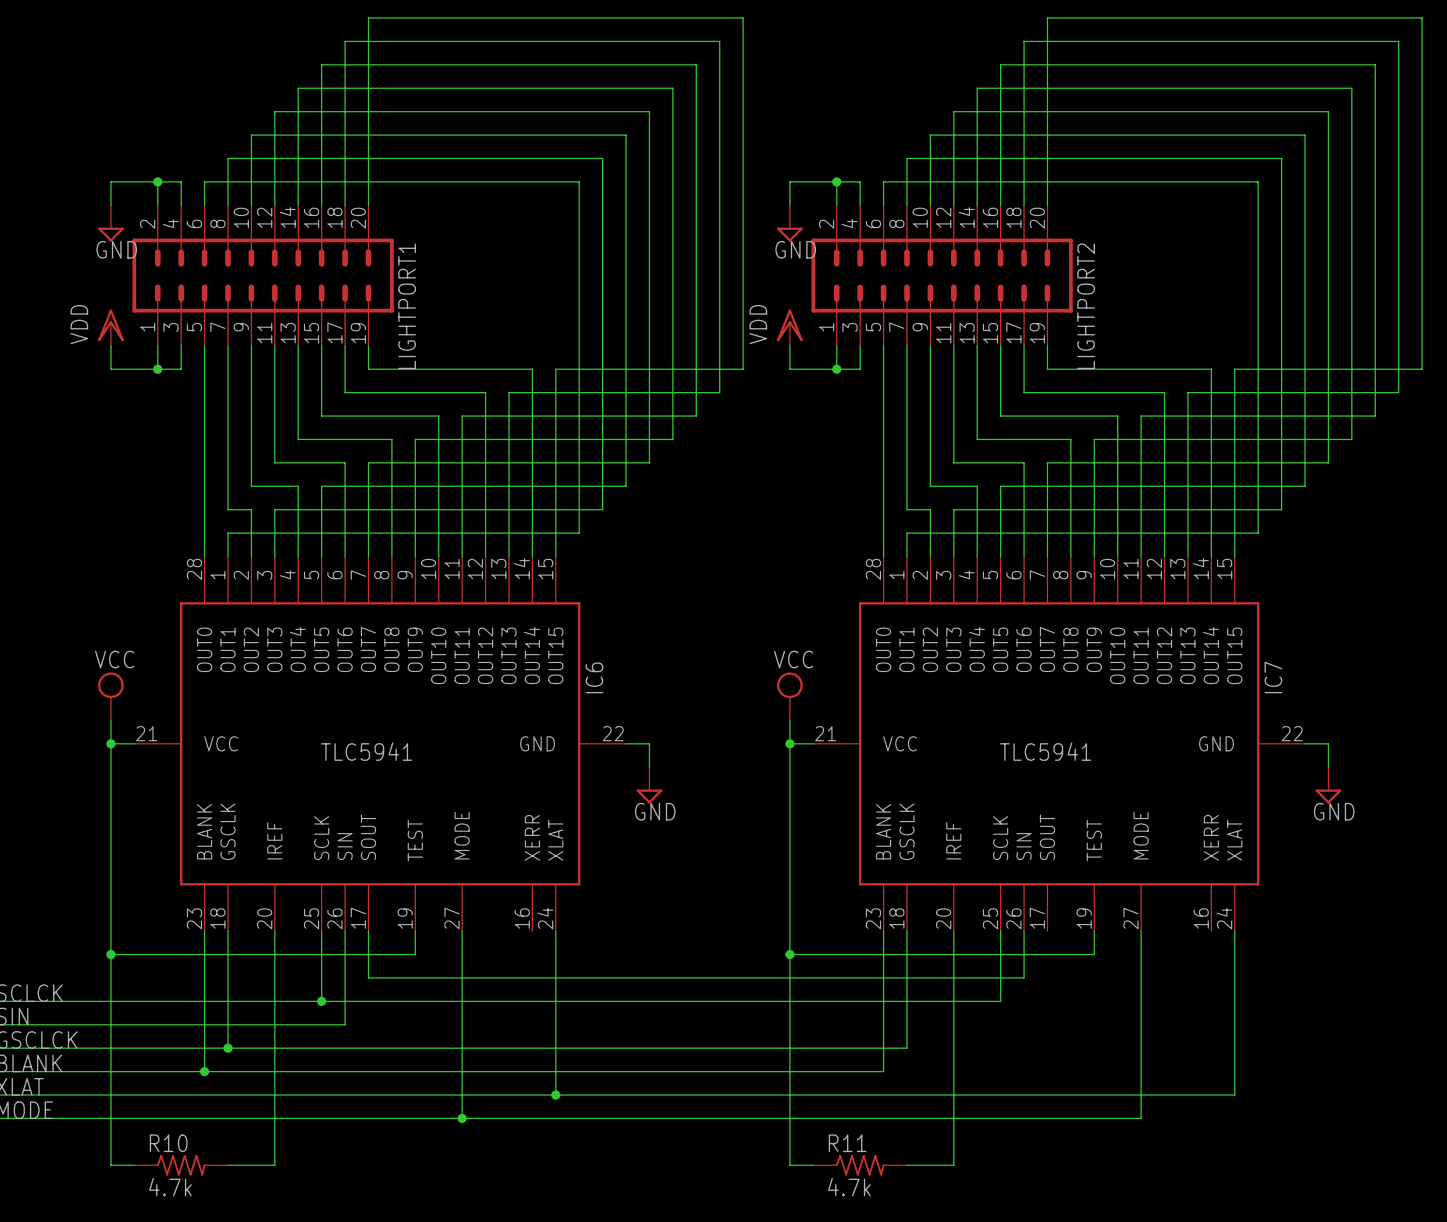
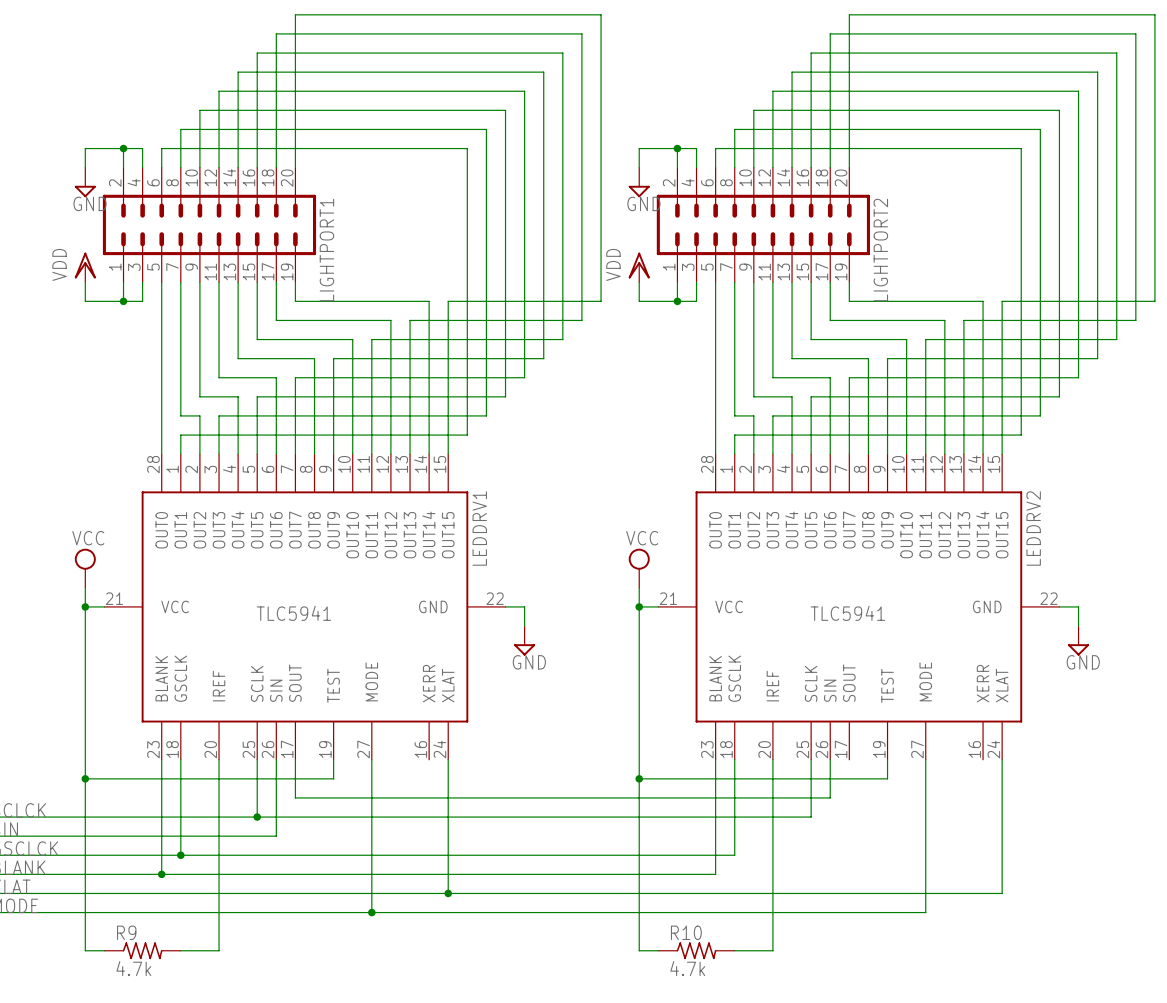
IC6 name: IC6 (594, 677) -> LEDDRV1 (479, 528)
IC7 name: IC7 (1273, 677) -> LEDDRV2 (1033, 528)
R10 name: R10 (168, 1143) -> R9 (126, 932)
R11 name: R11 (847, 1143) -> R10 (686, 932)

